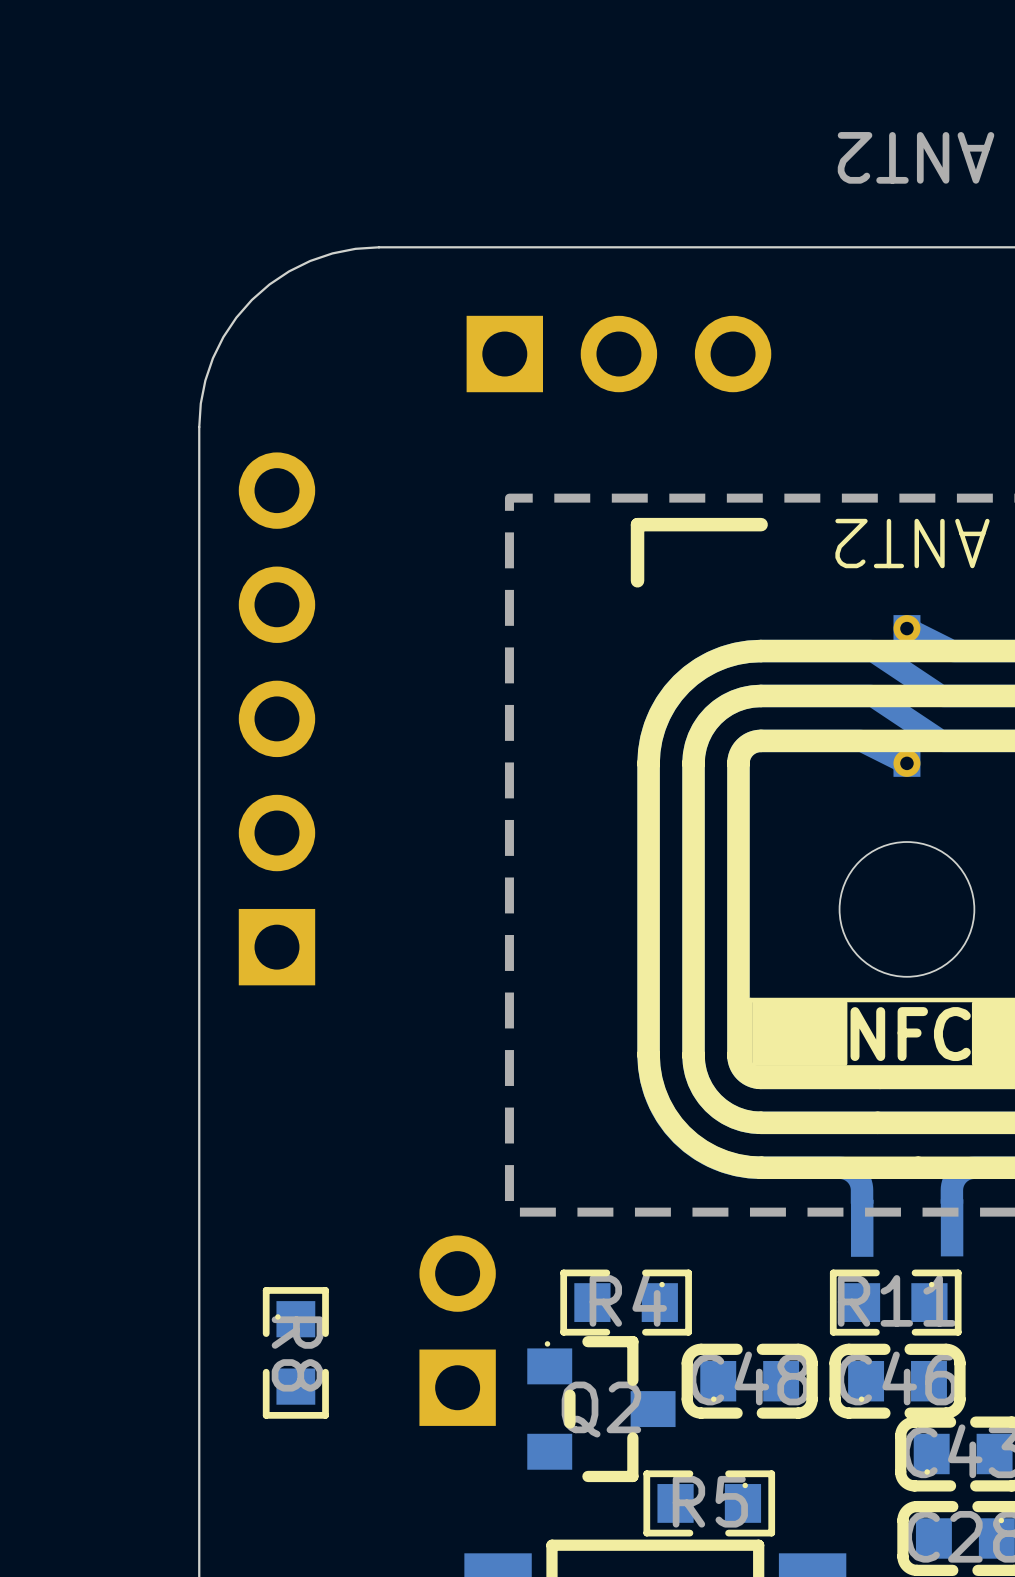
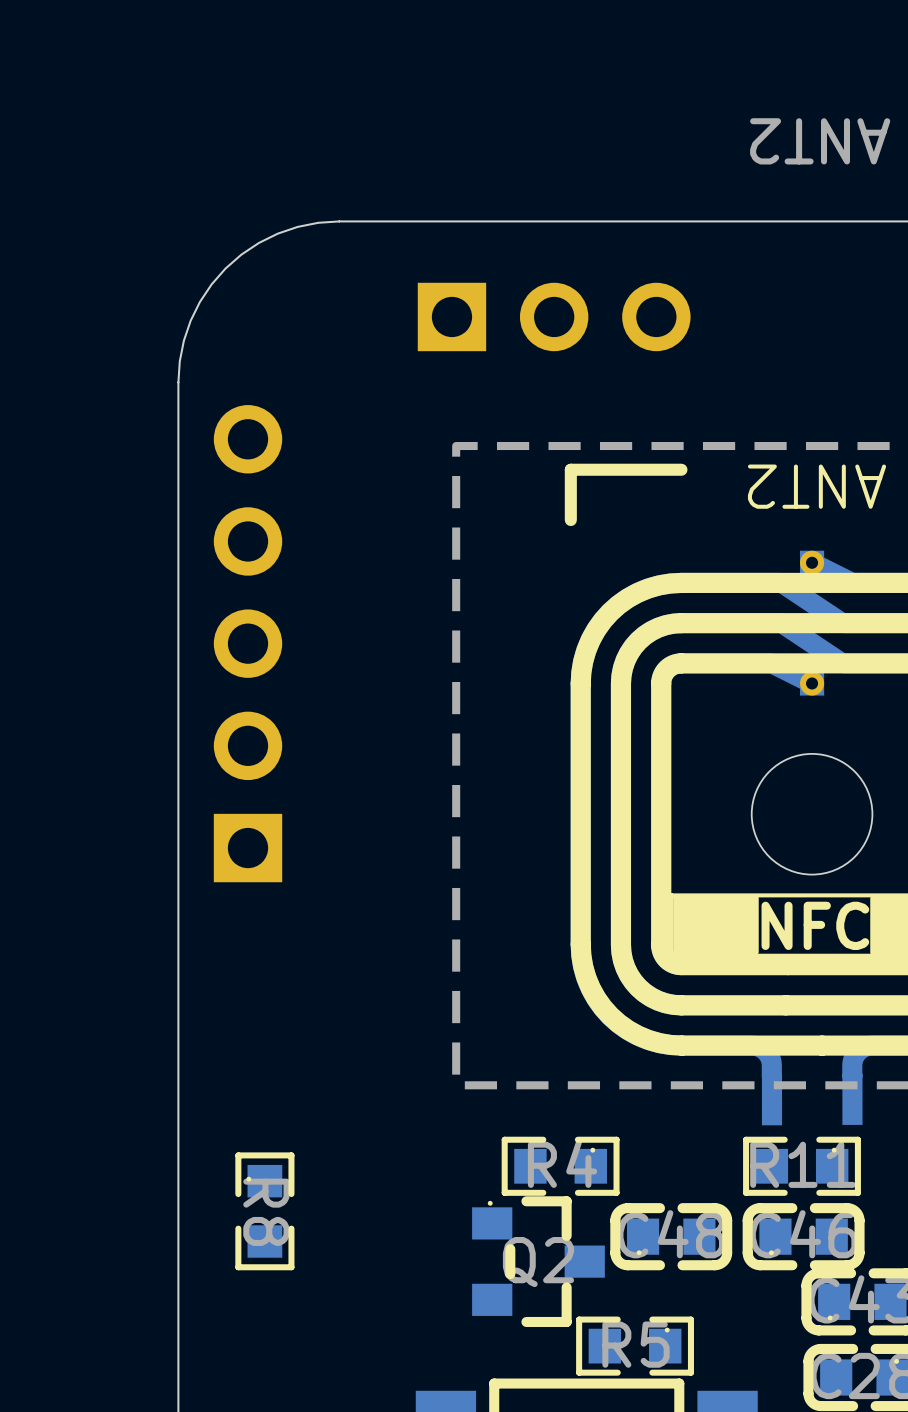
part: (457, 1330) -> none

